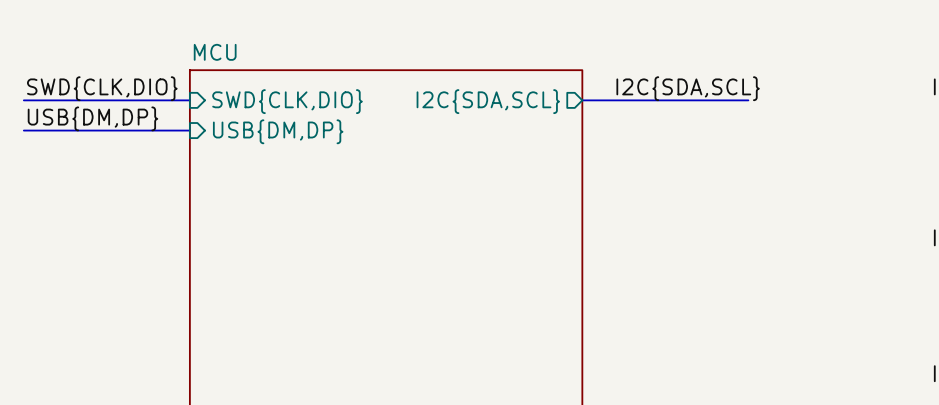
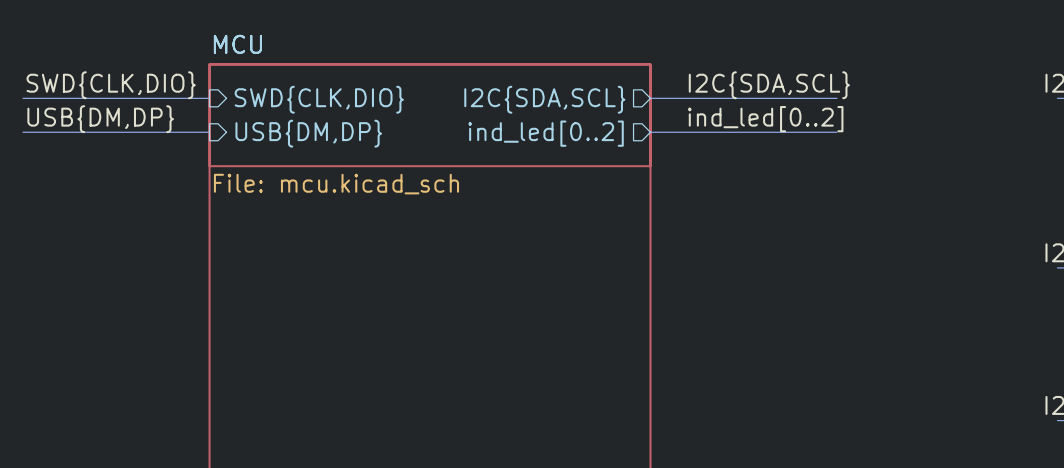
sheet MCU: none -> File: mcu.kicad_sch (430, 115)
label: none -> ind_led[0..2] (765, 119)
bus: none -> (650, 132) (837, 132)
sheet pin: none -> ind_led[0..2] (546, 133)

